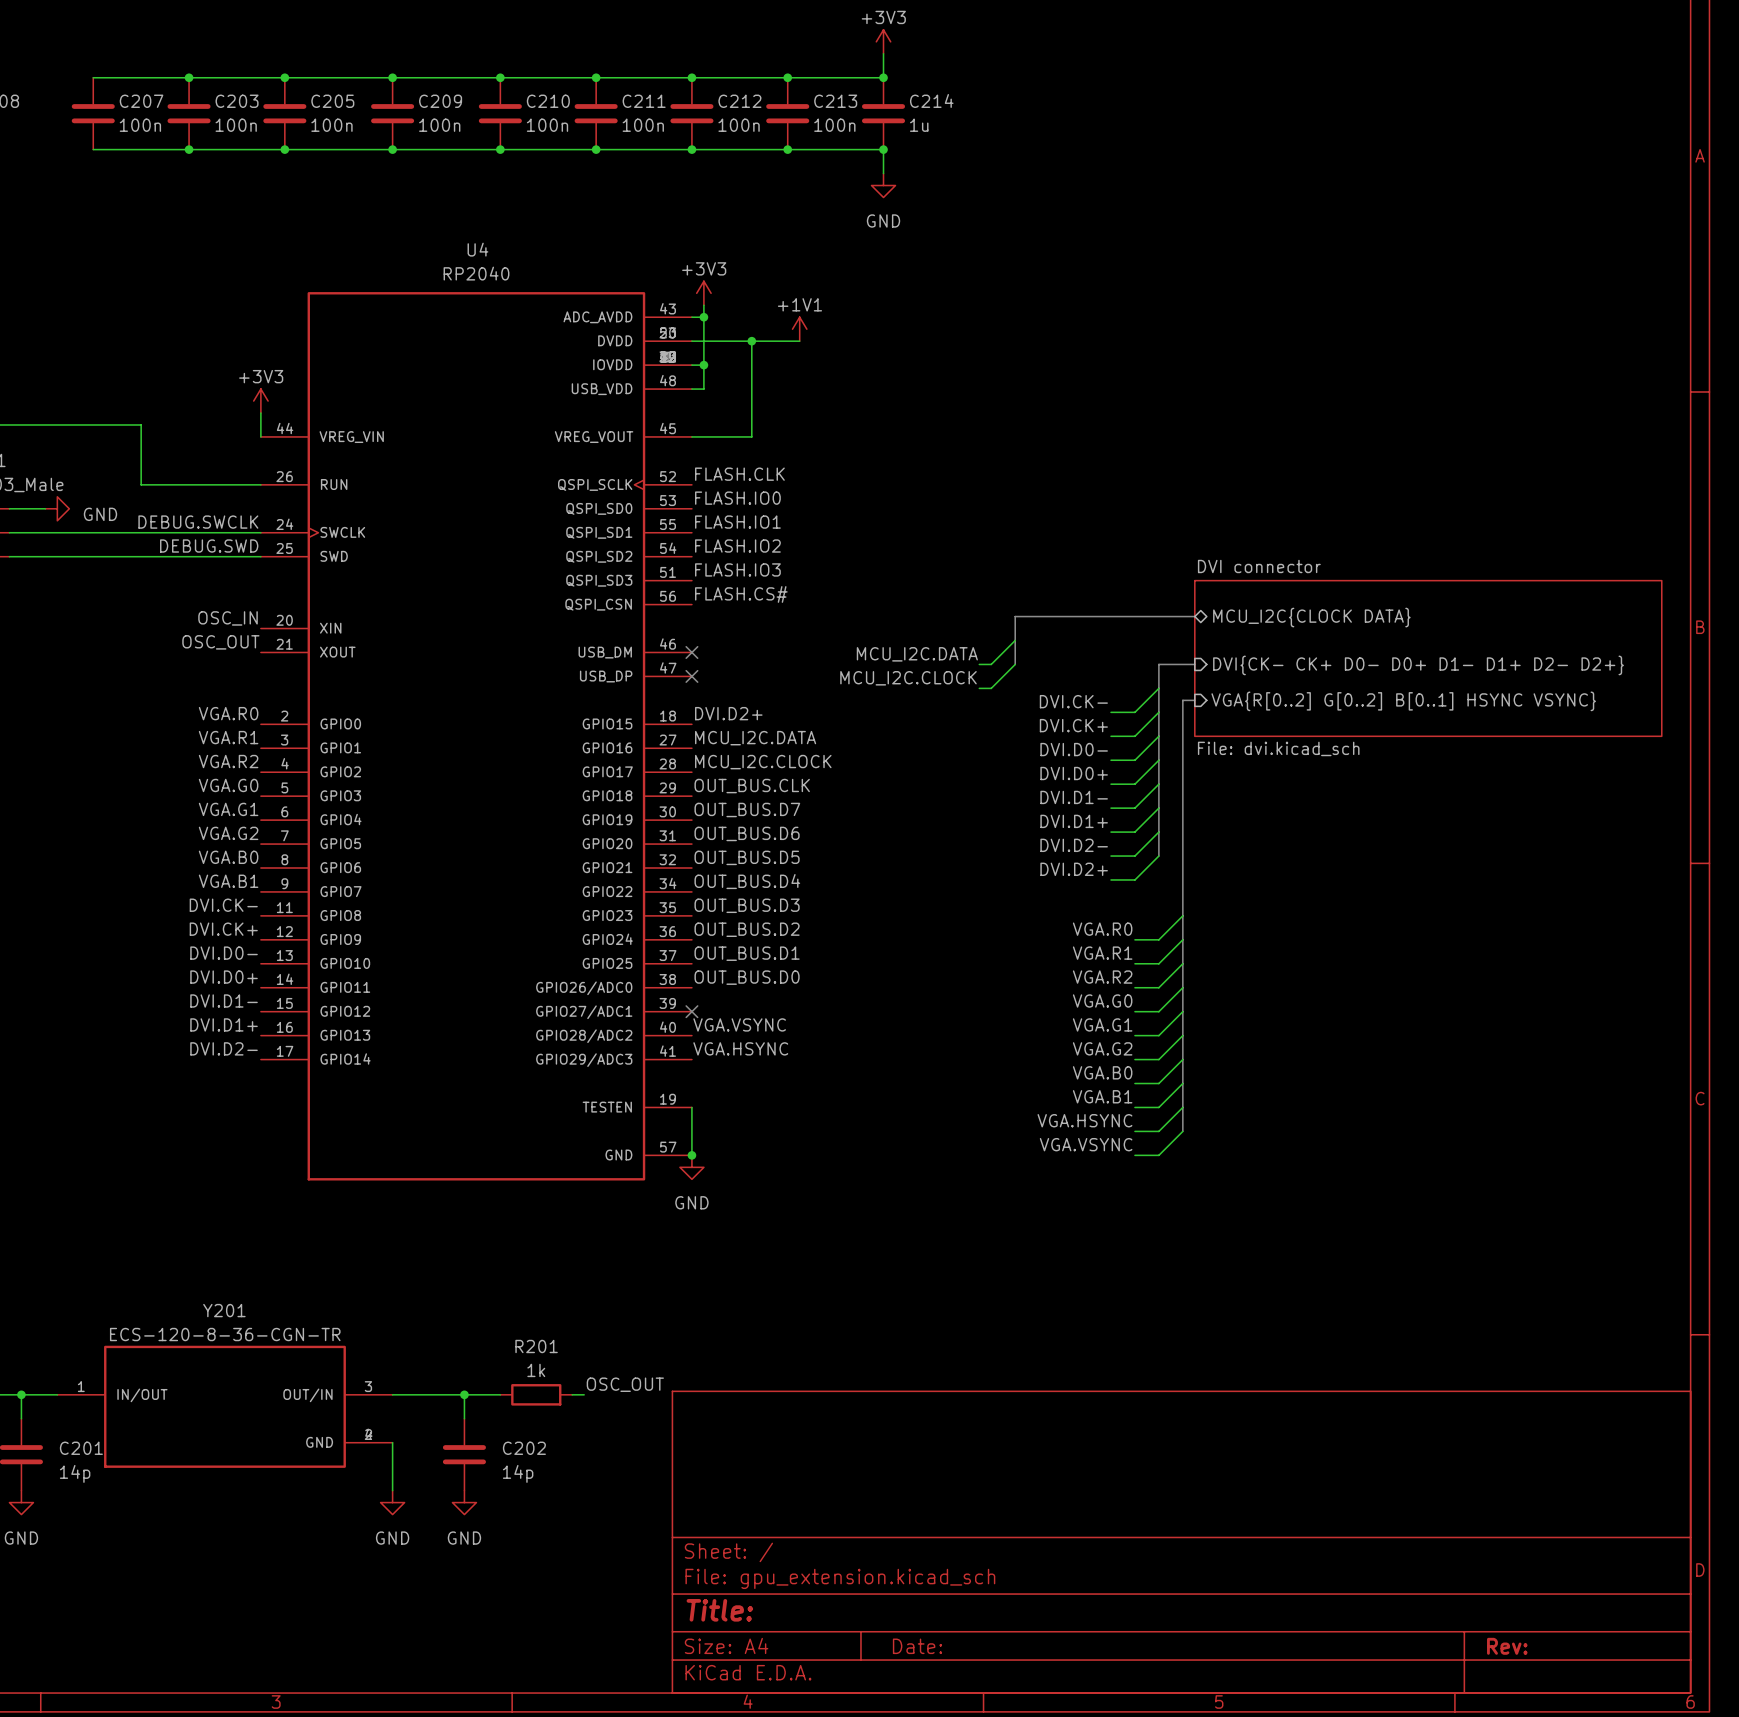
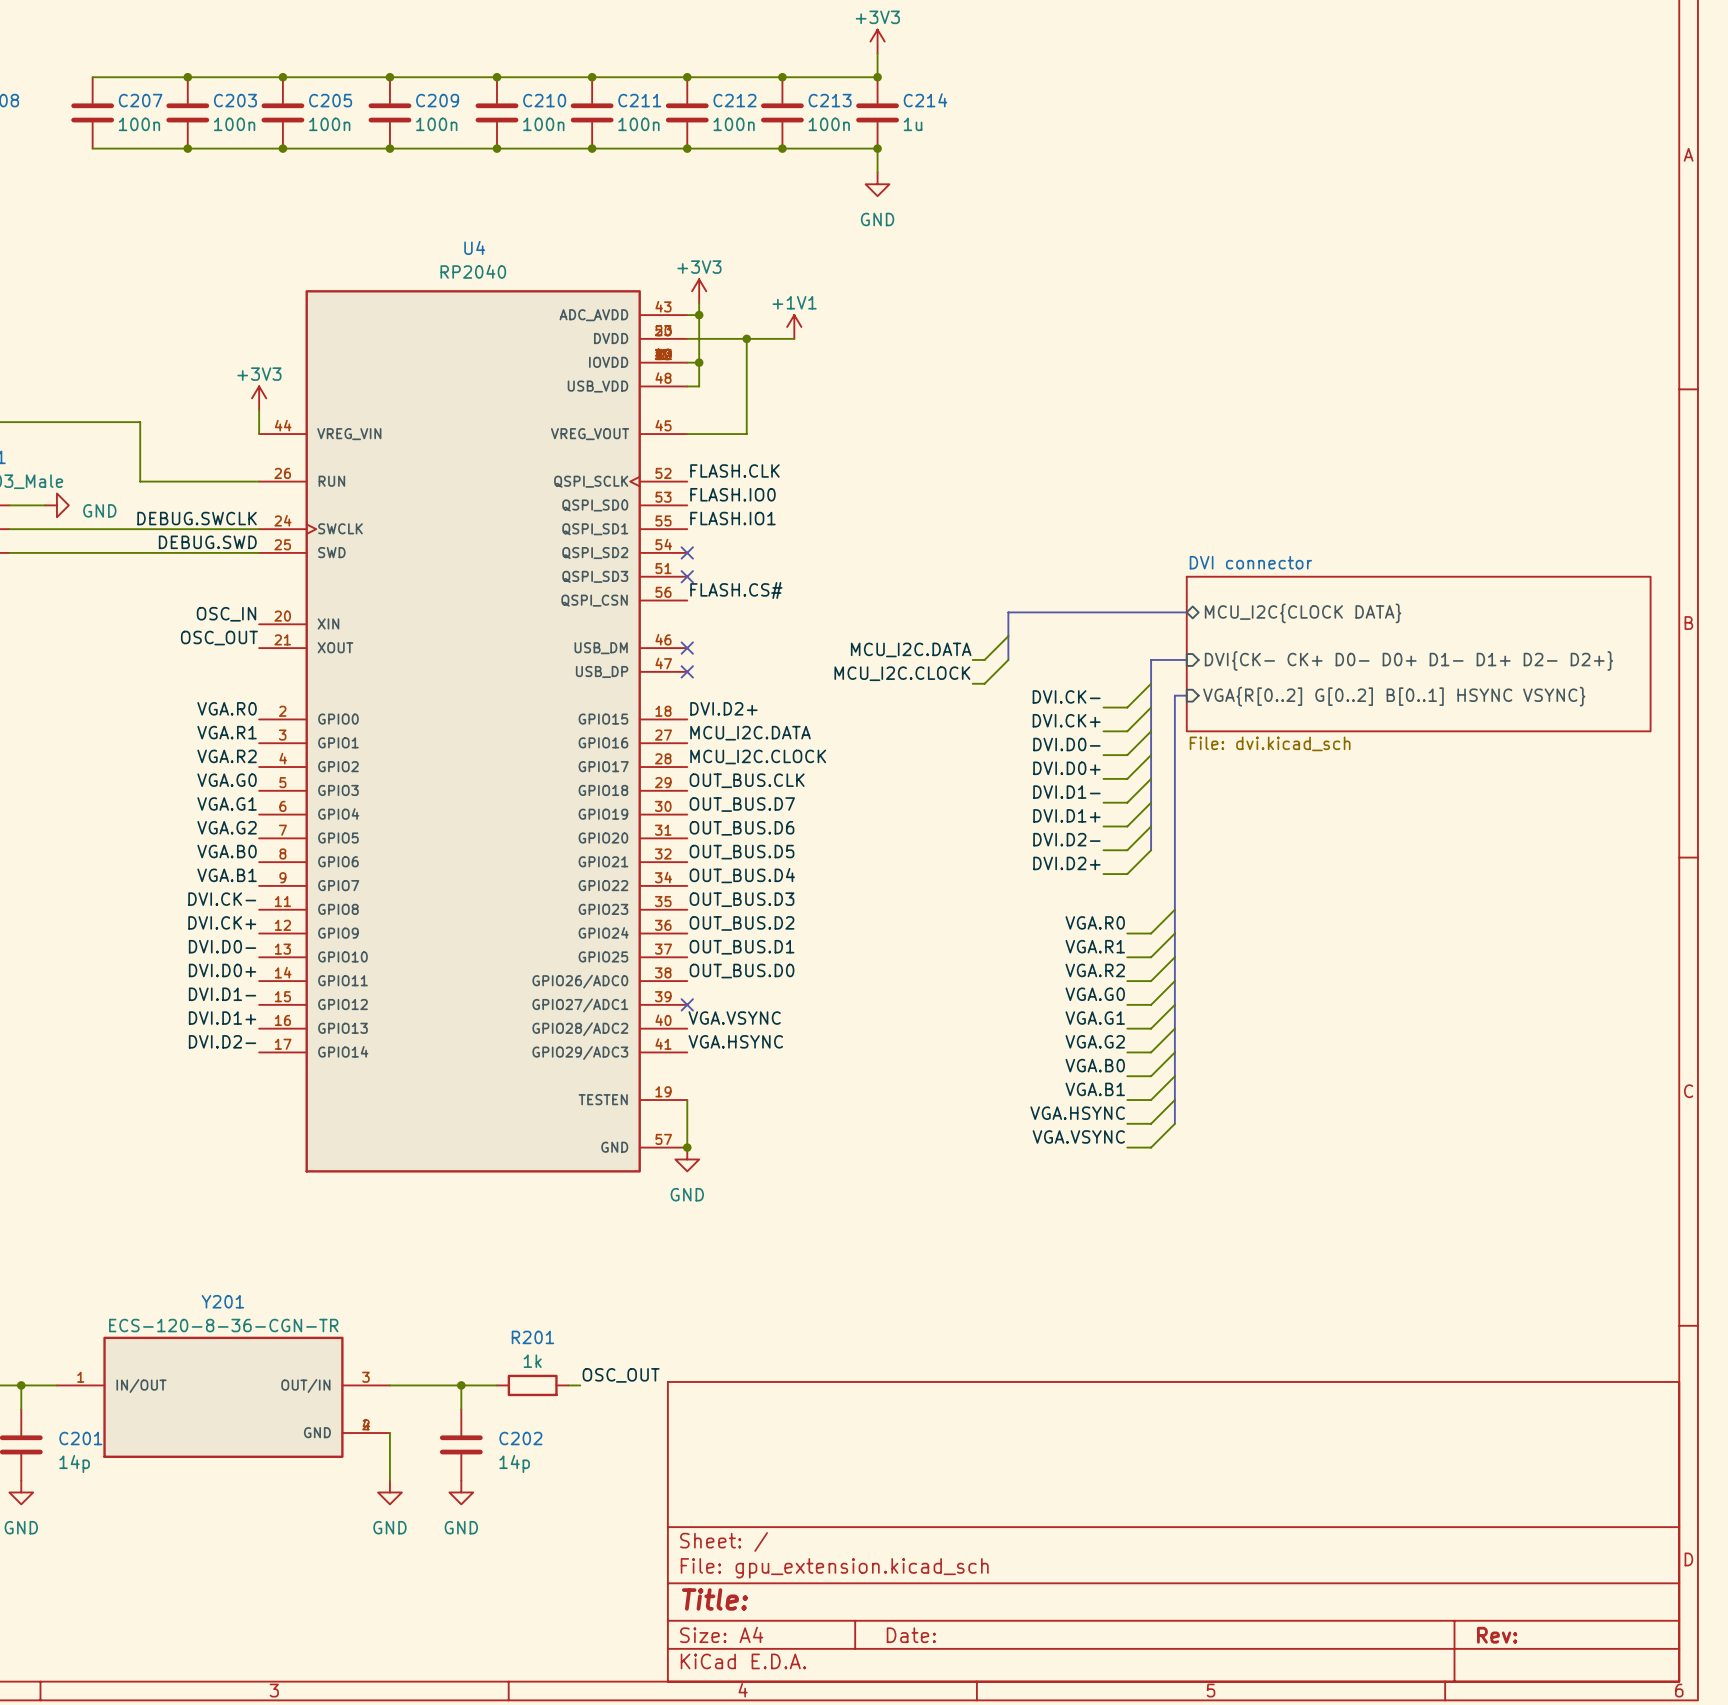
label: FLASH.IO2 (737, 546) -> none
no-connect mark: none -> (687, 552)
label: FLASH.IO3 (737, 569) -> none
no-connect mark: none -> (687, 576)

